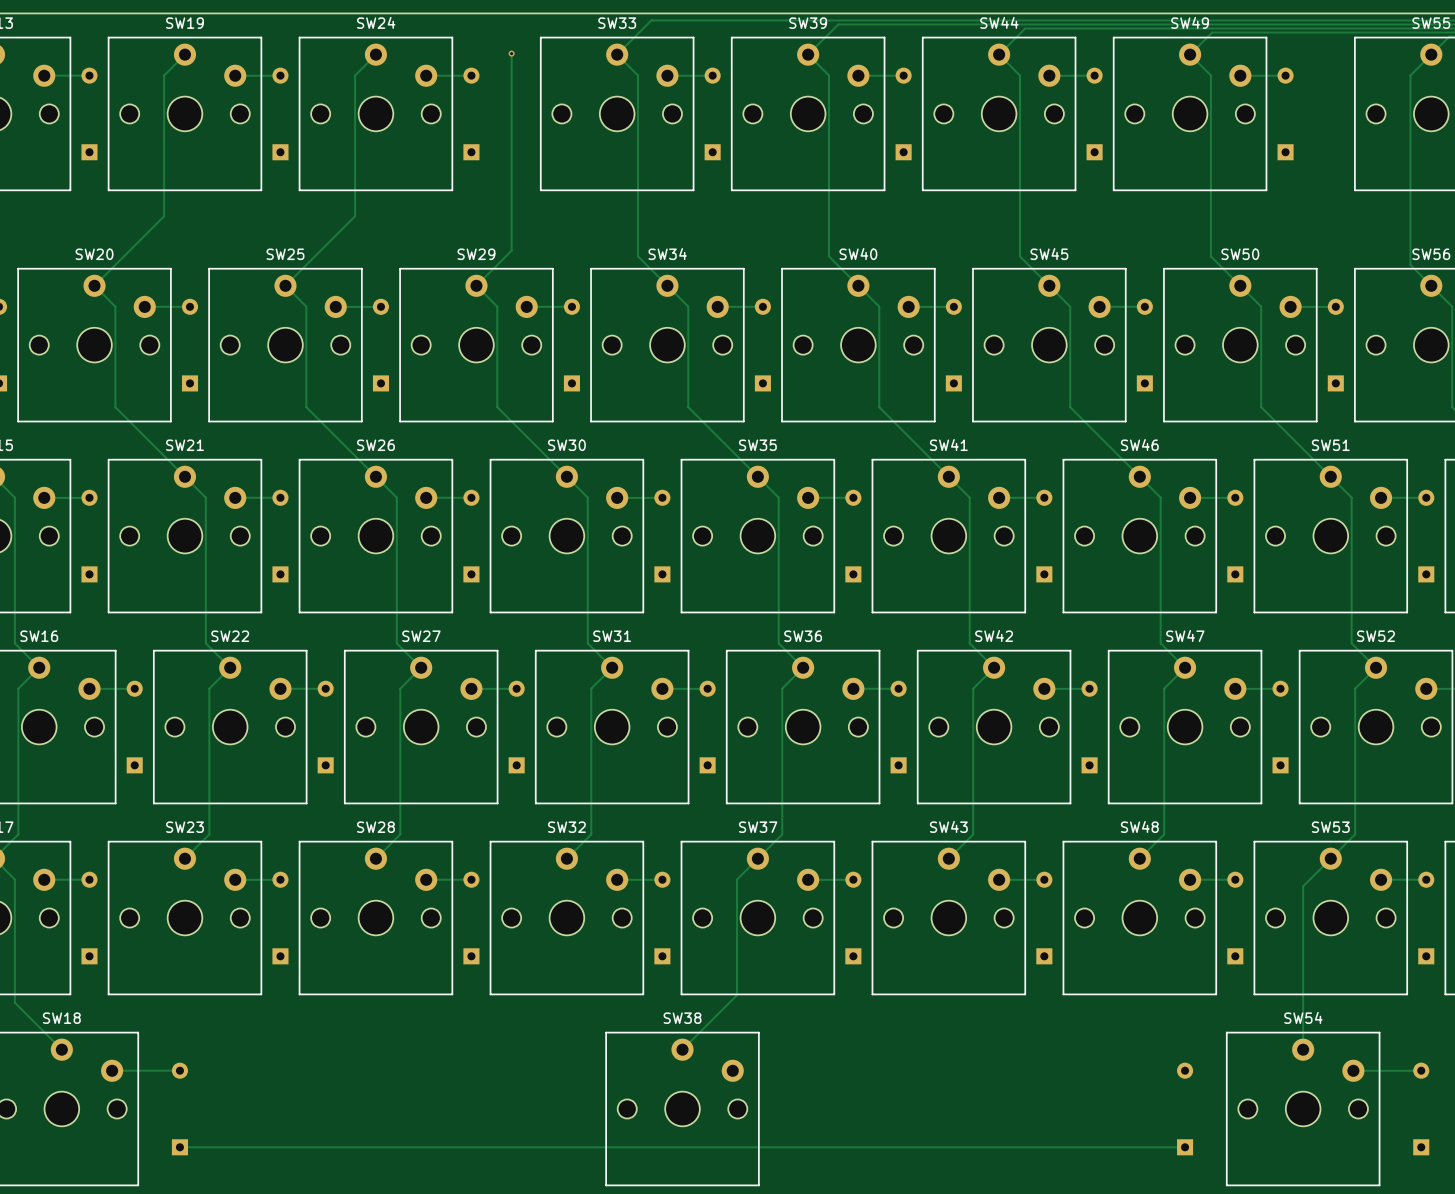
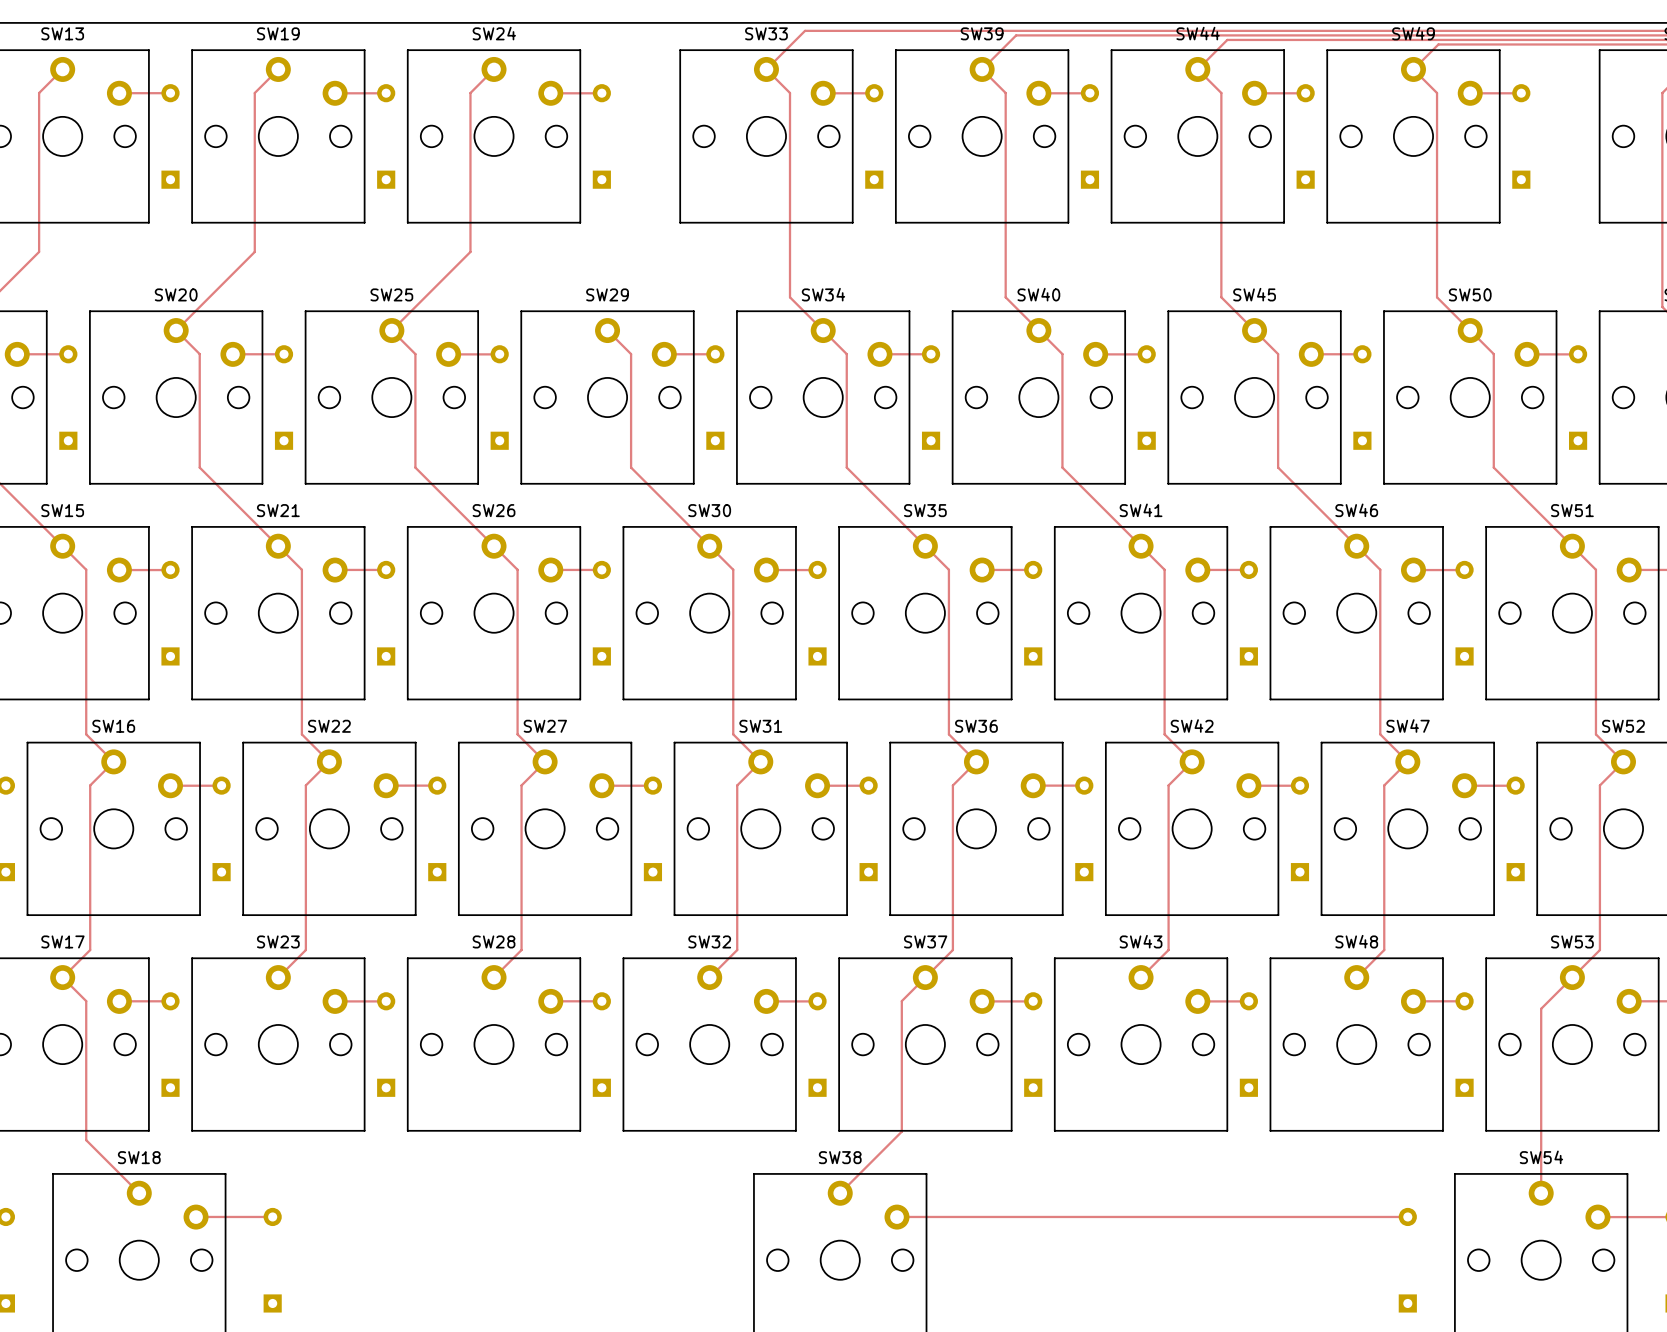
track: (511, 53) (511, 250) (476, 285) -> none
via: (511, 53) -> none
track: none -> (897, 1216) (1407, 1216)
track: (179, 1147) (1185, 1147) -> none

